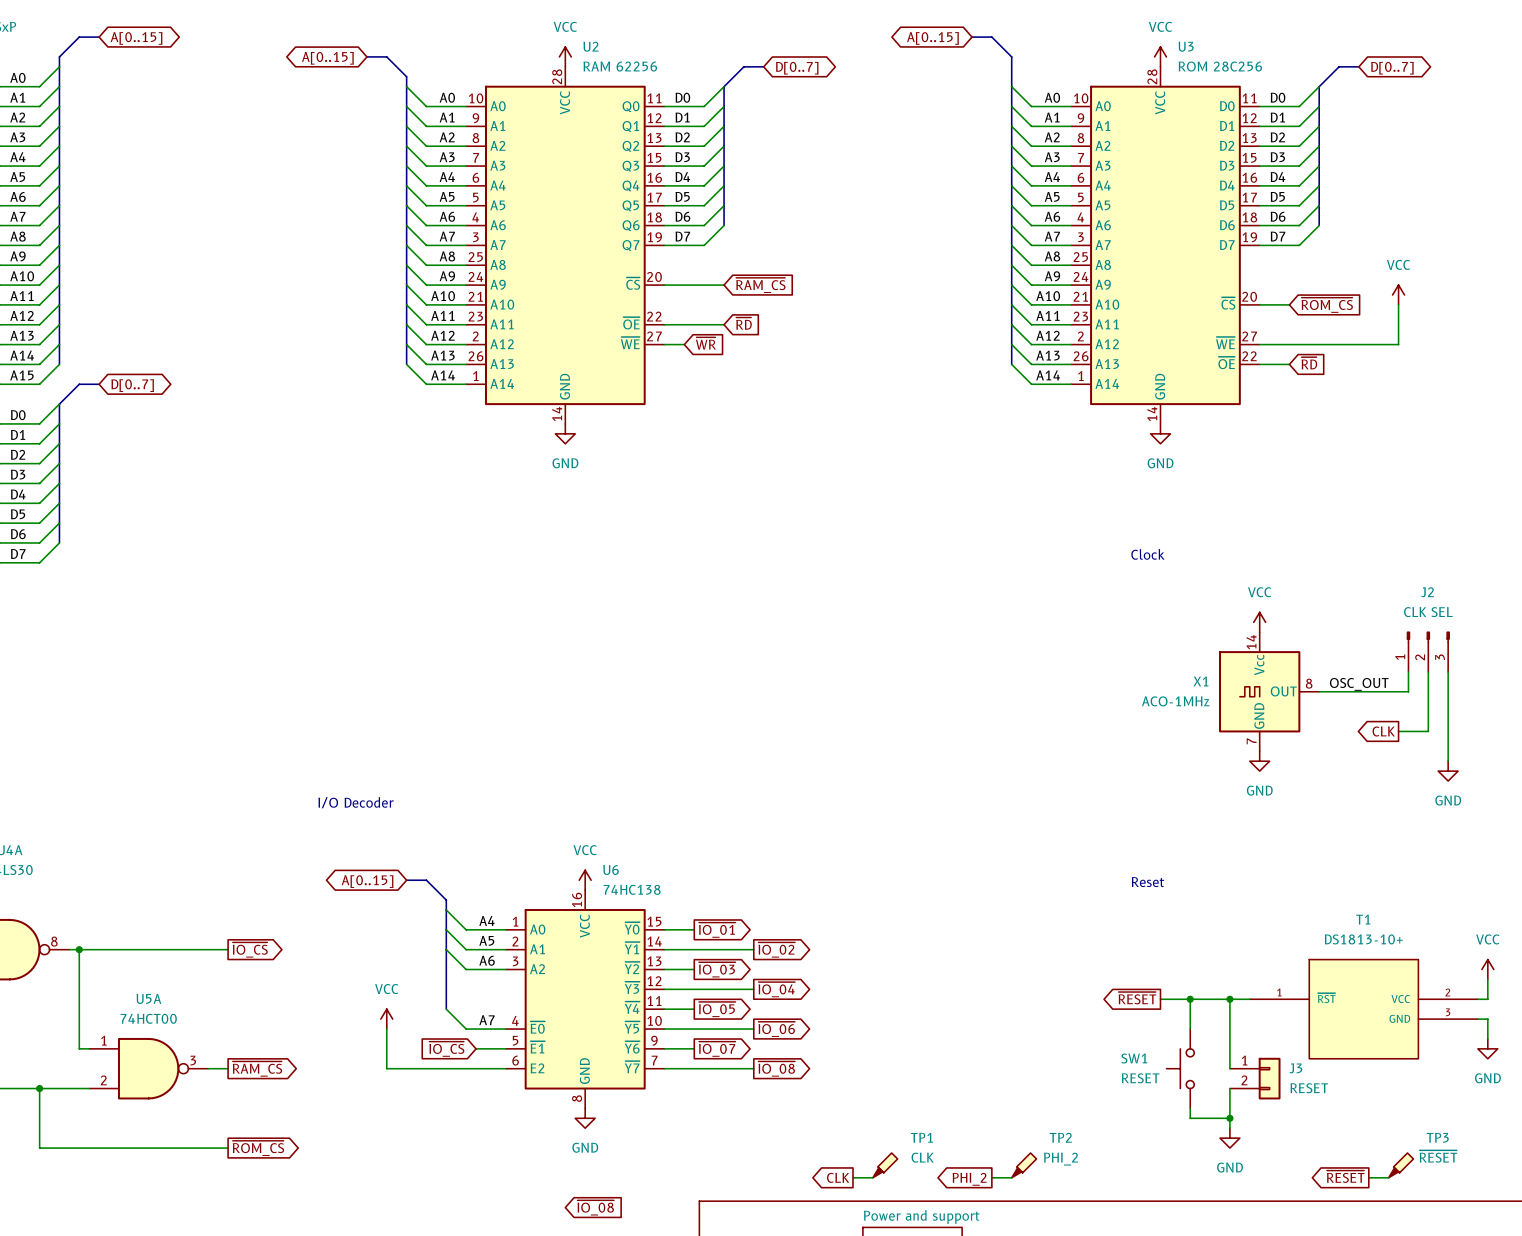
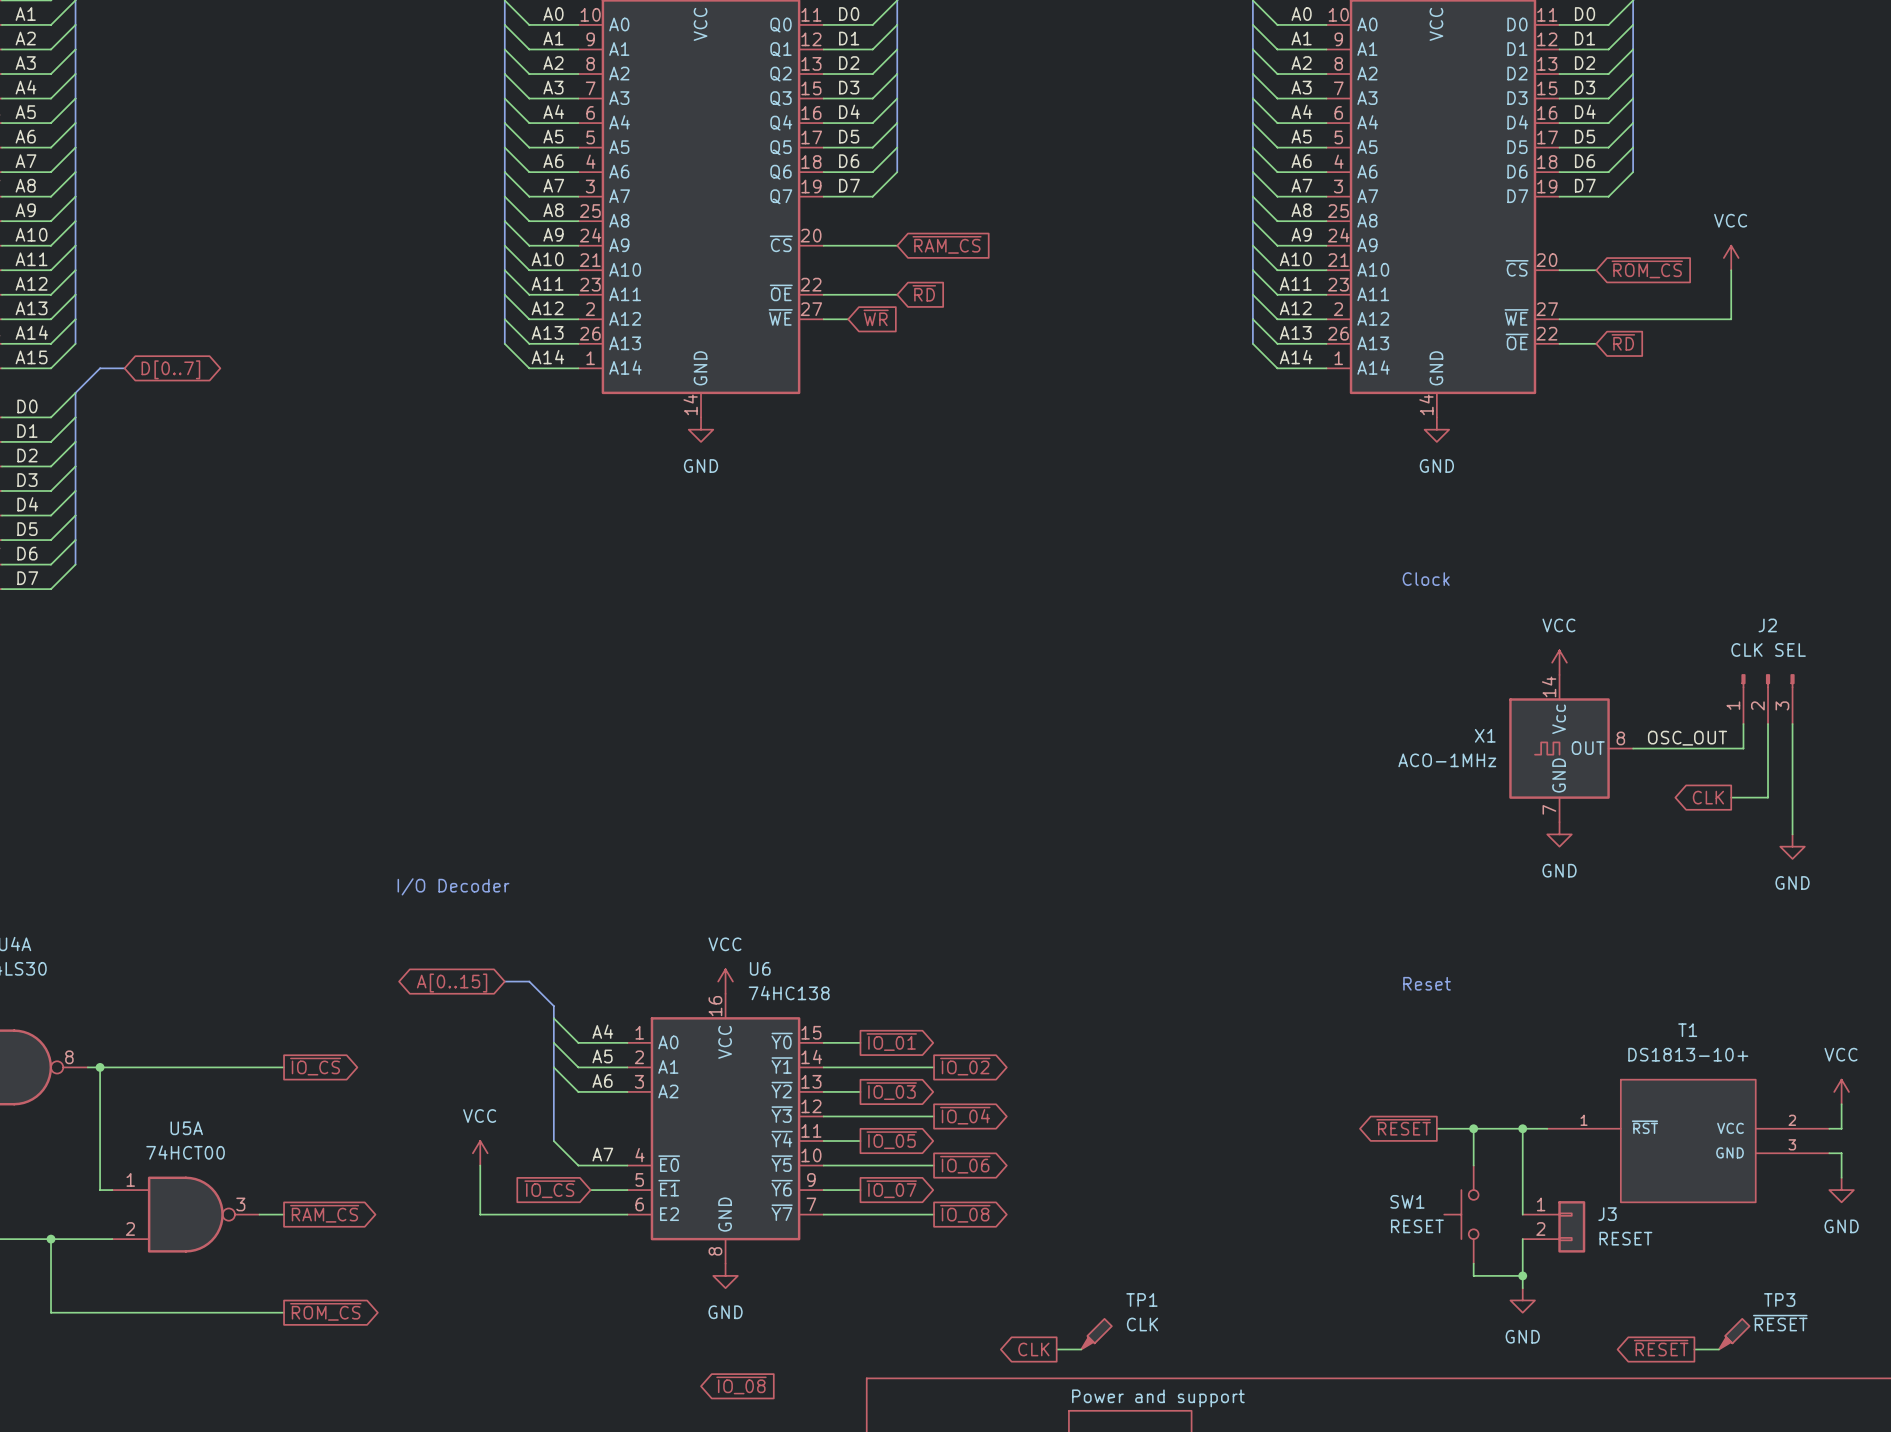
TP2: PHI_2 (1024, 1165) -> none
wire: (991, 1177) (1011, 1177) -> none
global label: PHI_2 (969, 1179) -> none

